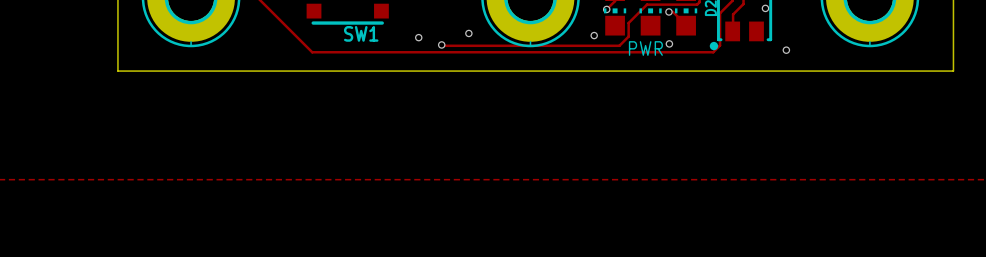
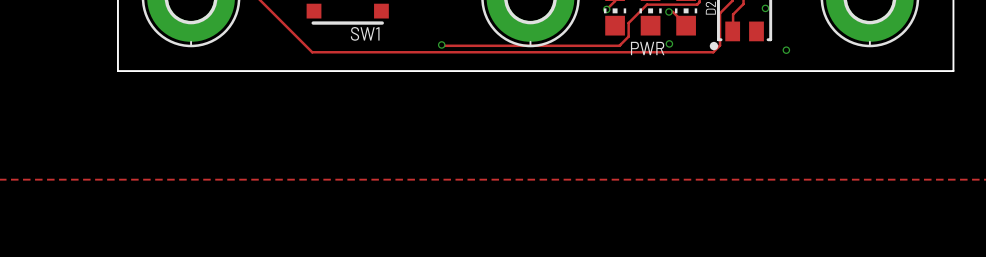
via: (468, 33) -> none
via: (594, 35) -> none
via: (418, 37) -> none

